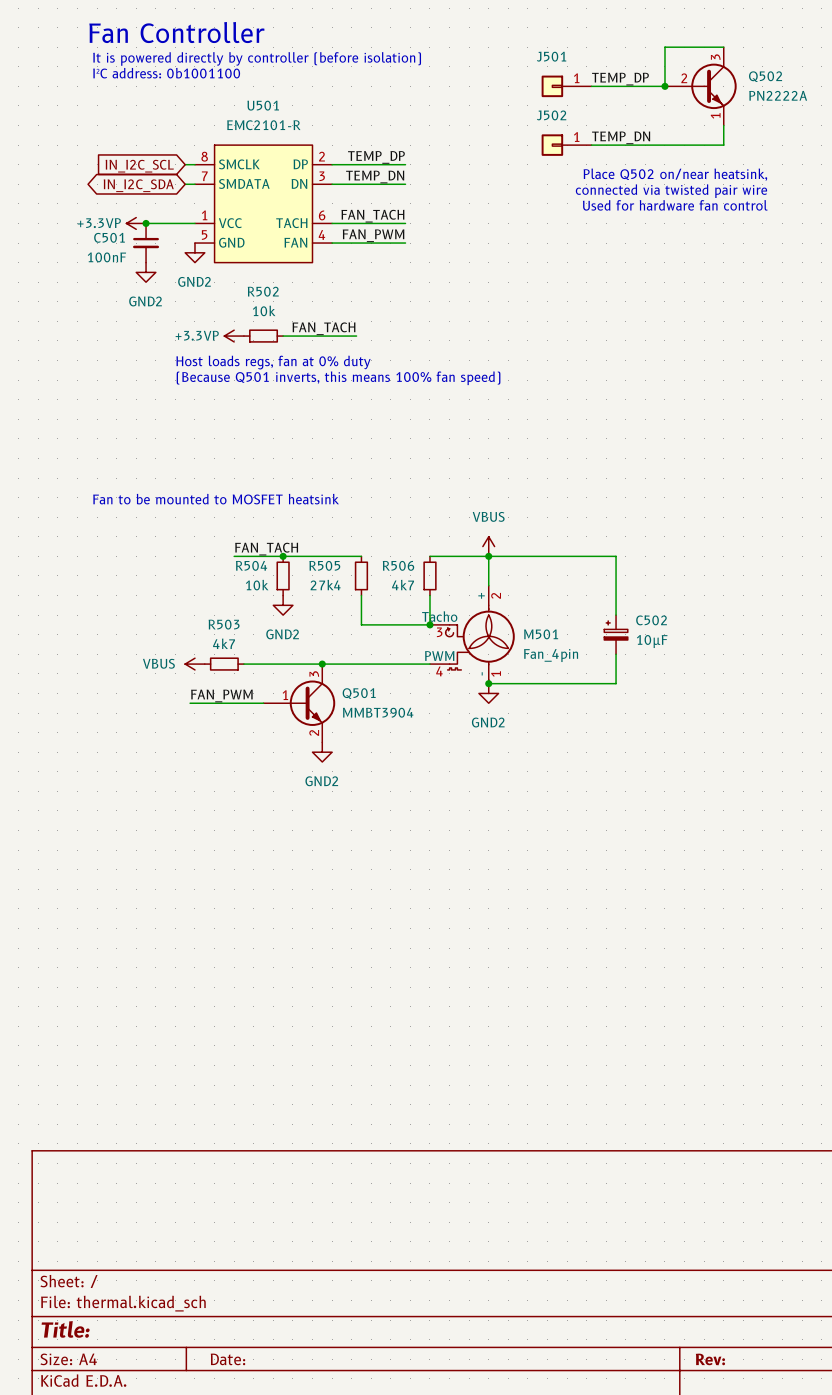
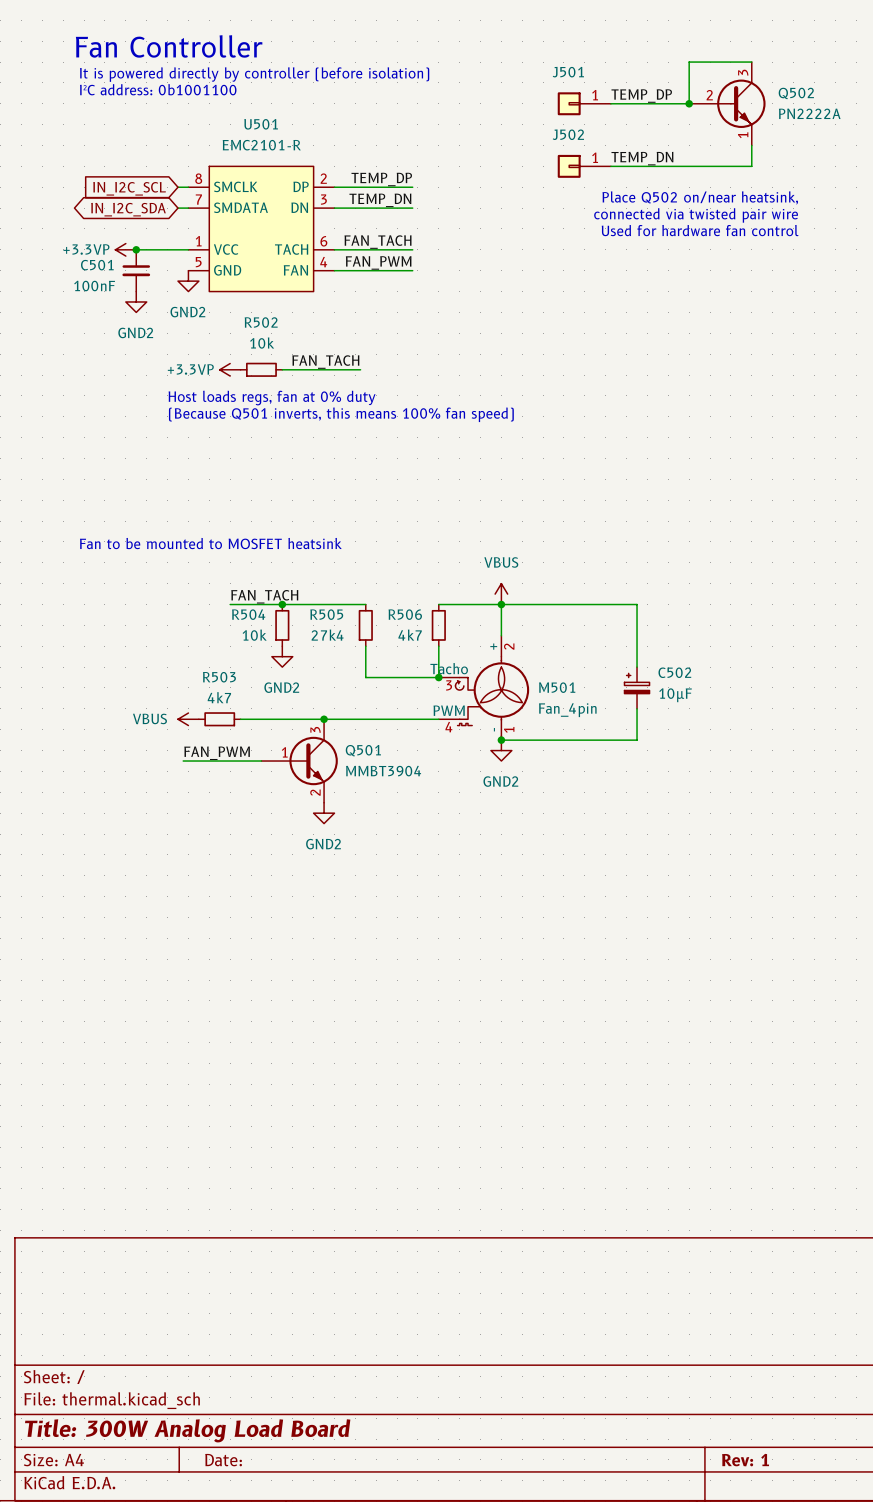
title block: Title: (65, 1329) -> Title: 300W Analog Load Board (187, 1430)
title block: Rev: (710, 1359) -> Rev: 1 (745, 1460)

